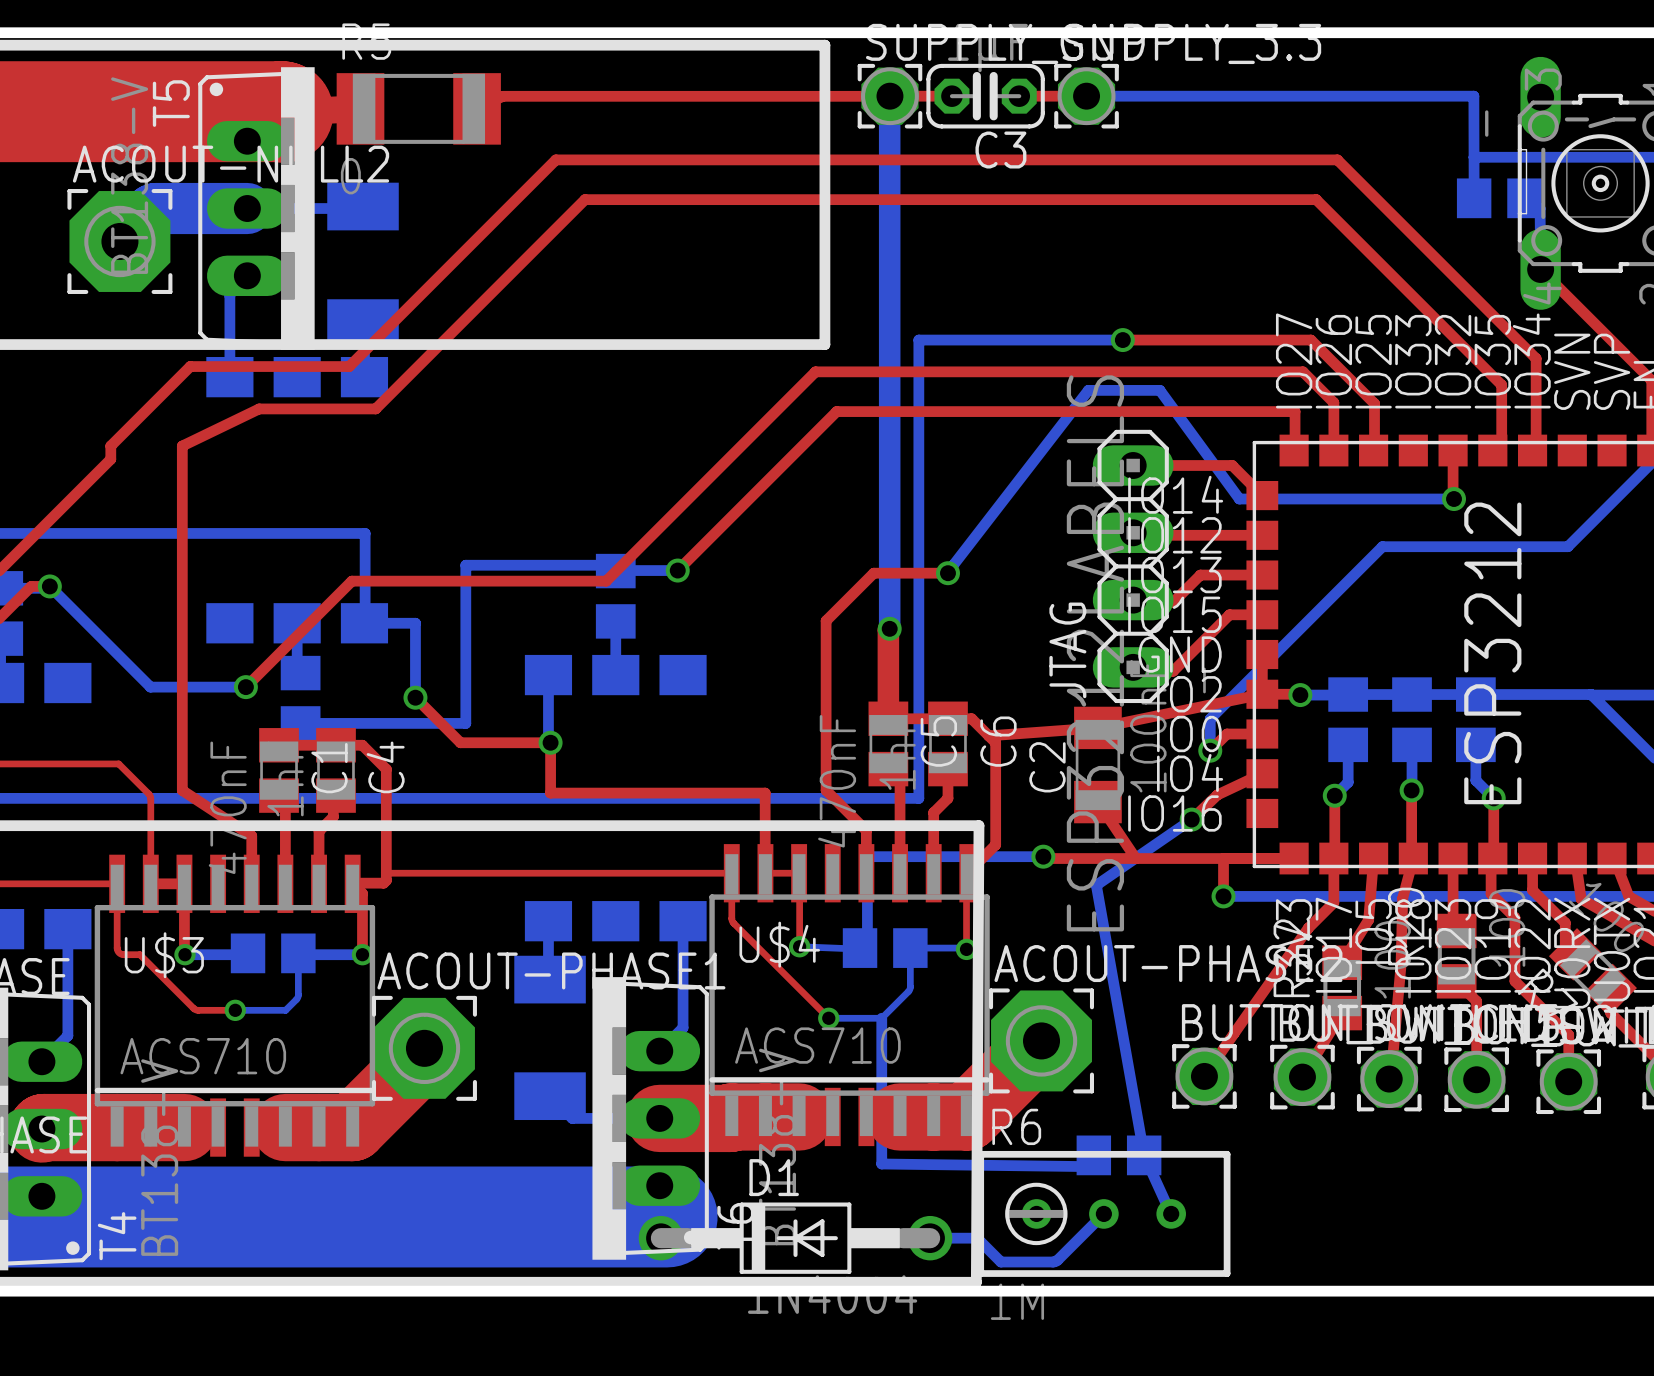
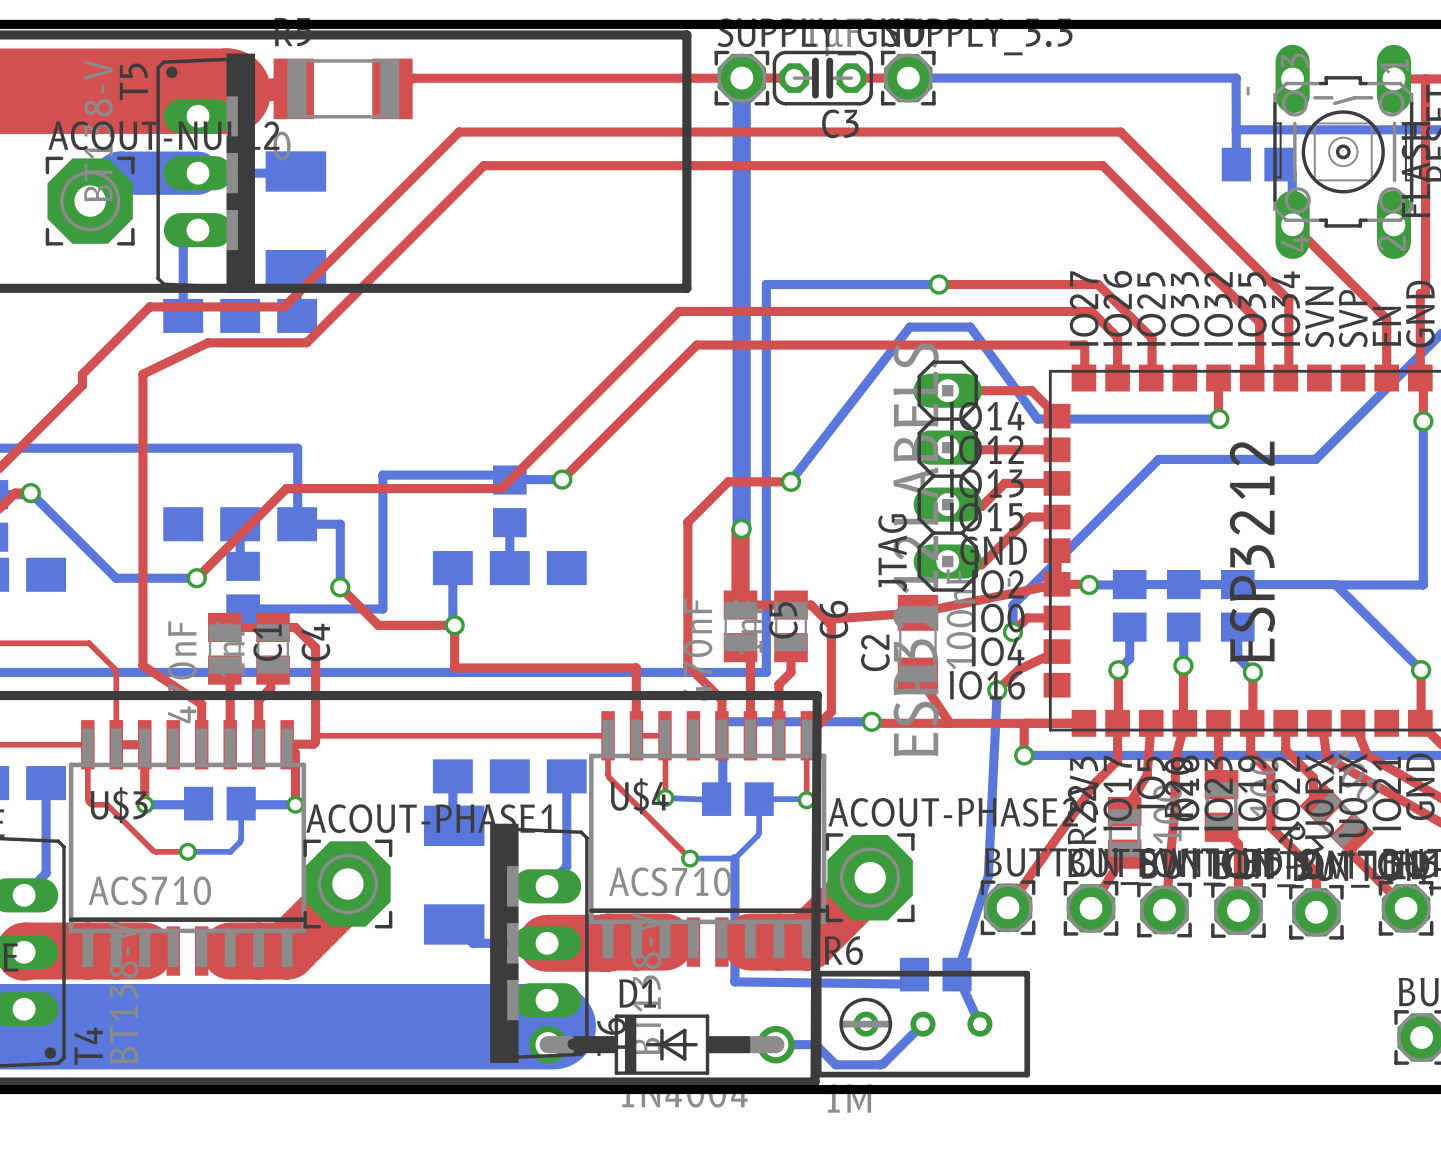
bottom track: (1191, 819) (1096, 885) (1144, 1155) -> (997, 690) (988, 876) (957, 974)

